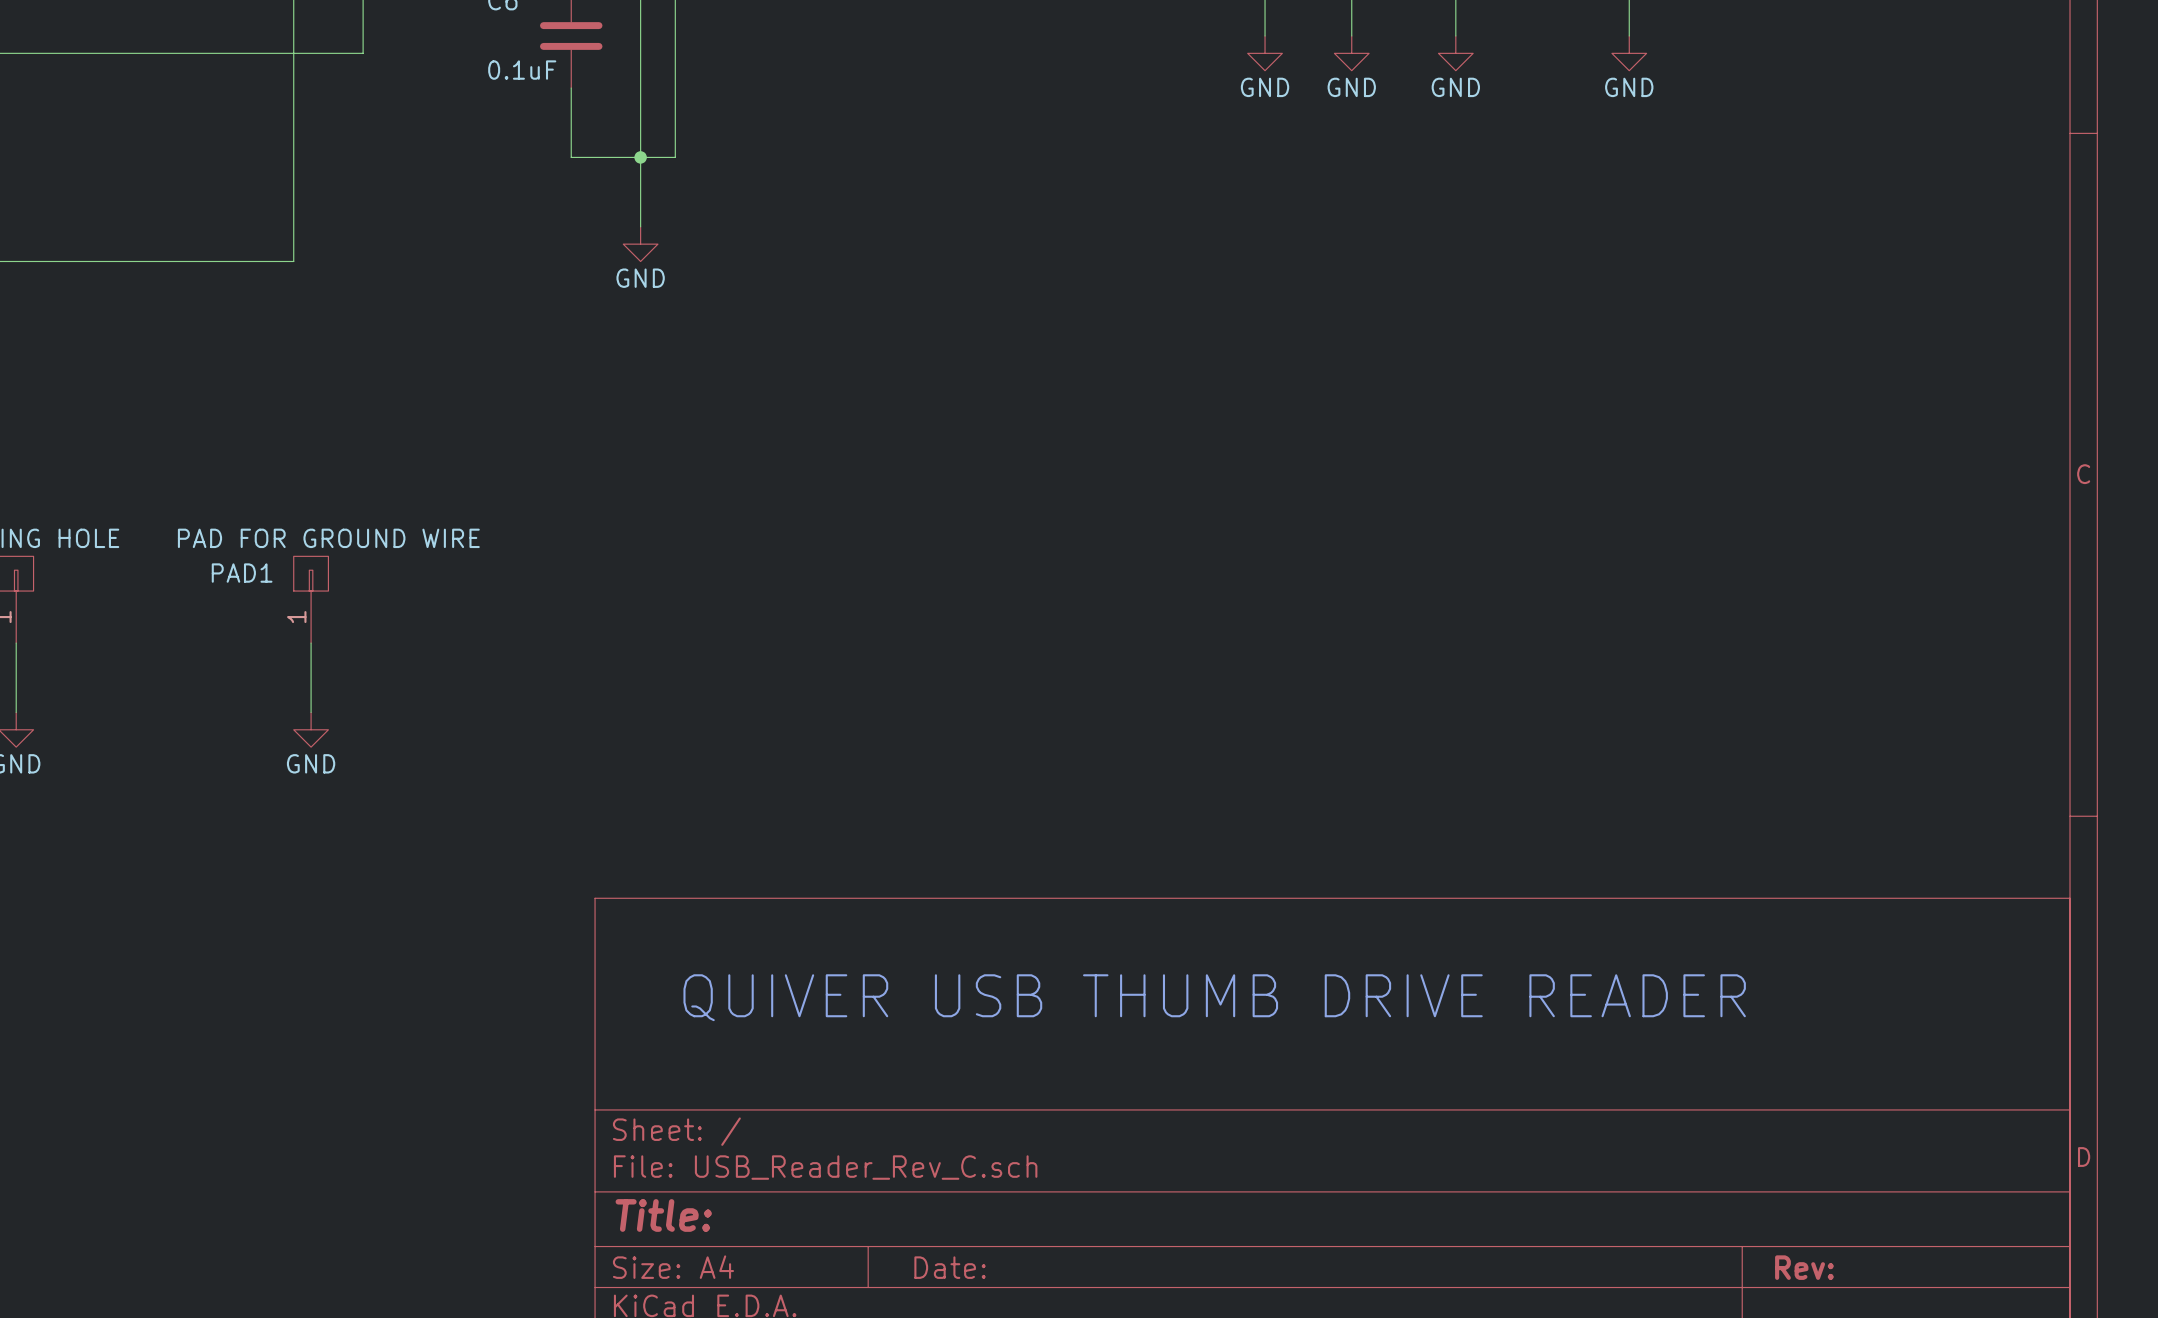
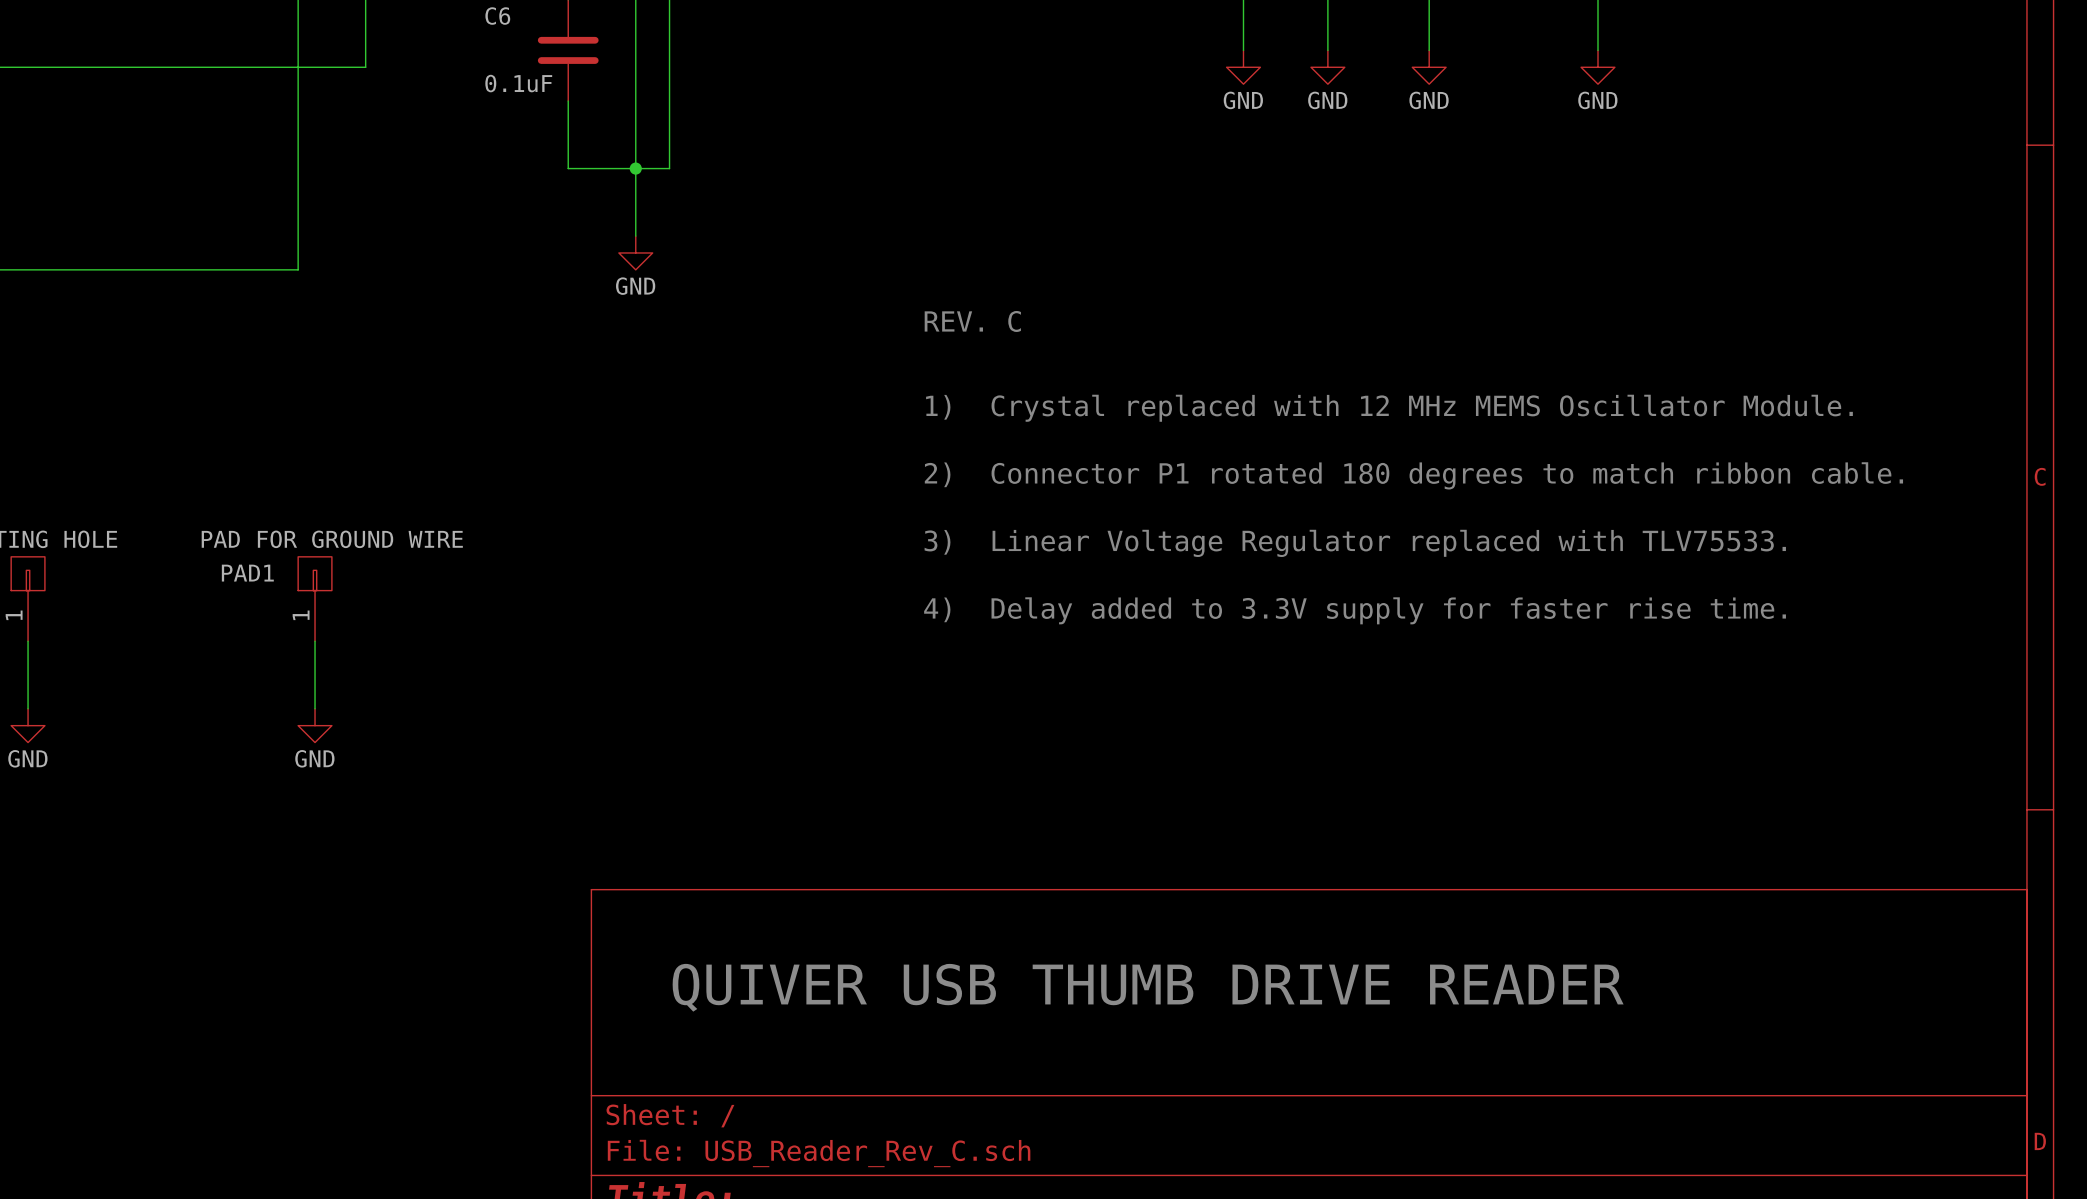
text: none -> REV. C (972, 321)
text: none -> 1) Crystal replaced with 12 MHz MEMS Oscillator Module. (1389, 408)
text: none -> 2) Connector P1 rotated 180 degrees to match ribbon cable. (1413, 475)
text: none -> 3) Linear Voltage Regulator replaced with TLV75533. (1355, 543)
text: none -> 4) Delay added to 3.3V supply for faster rise time. (1355, 610)

